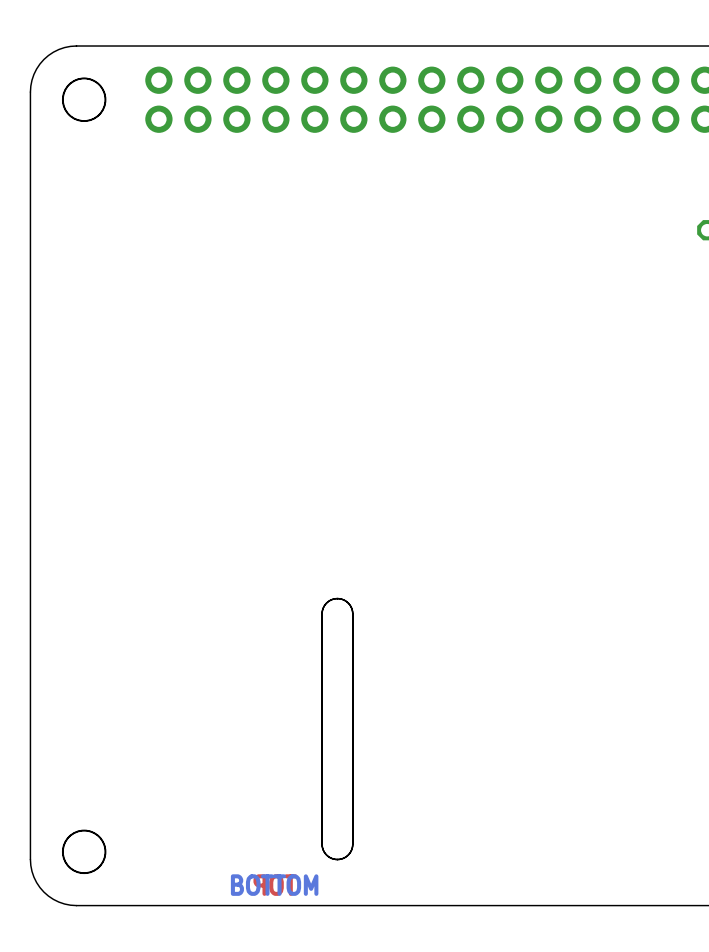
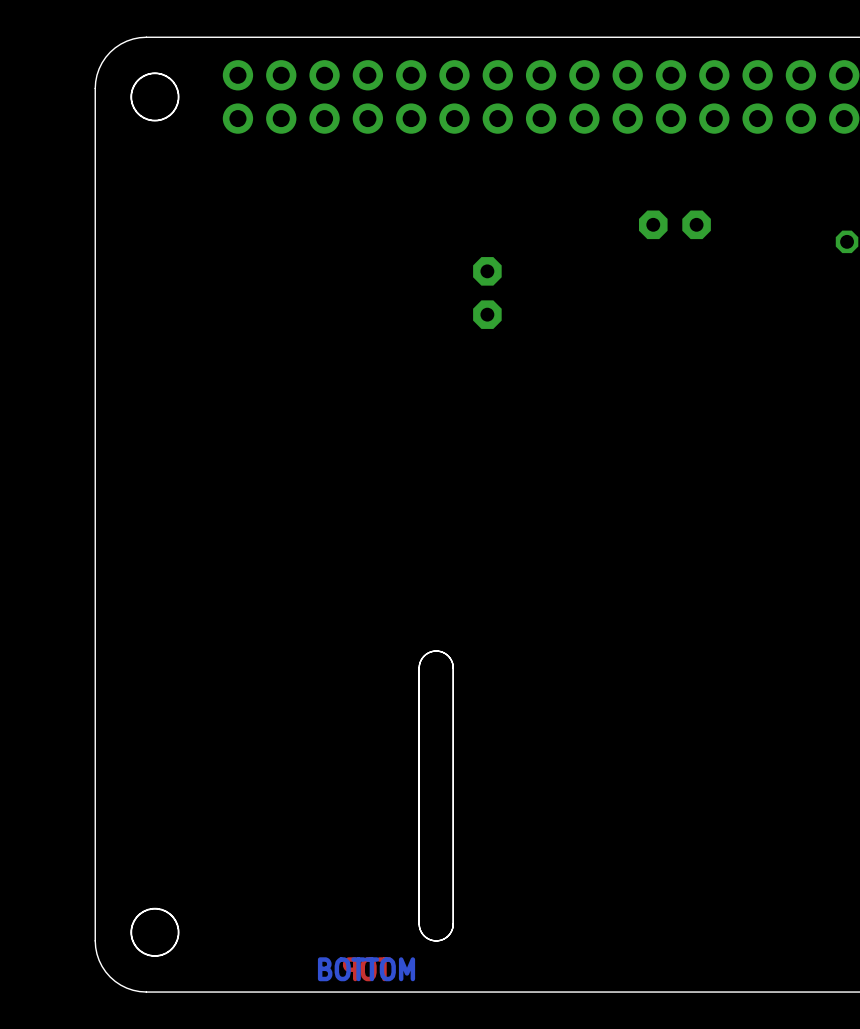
part: none -> (674, 224)
part: none -> (487, 293)

